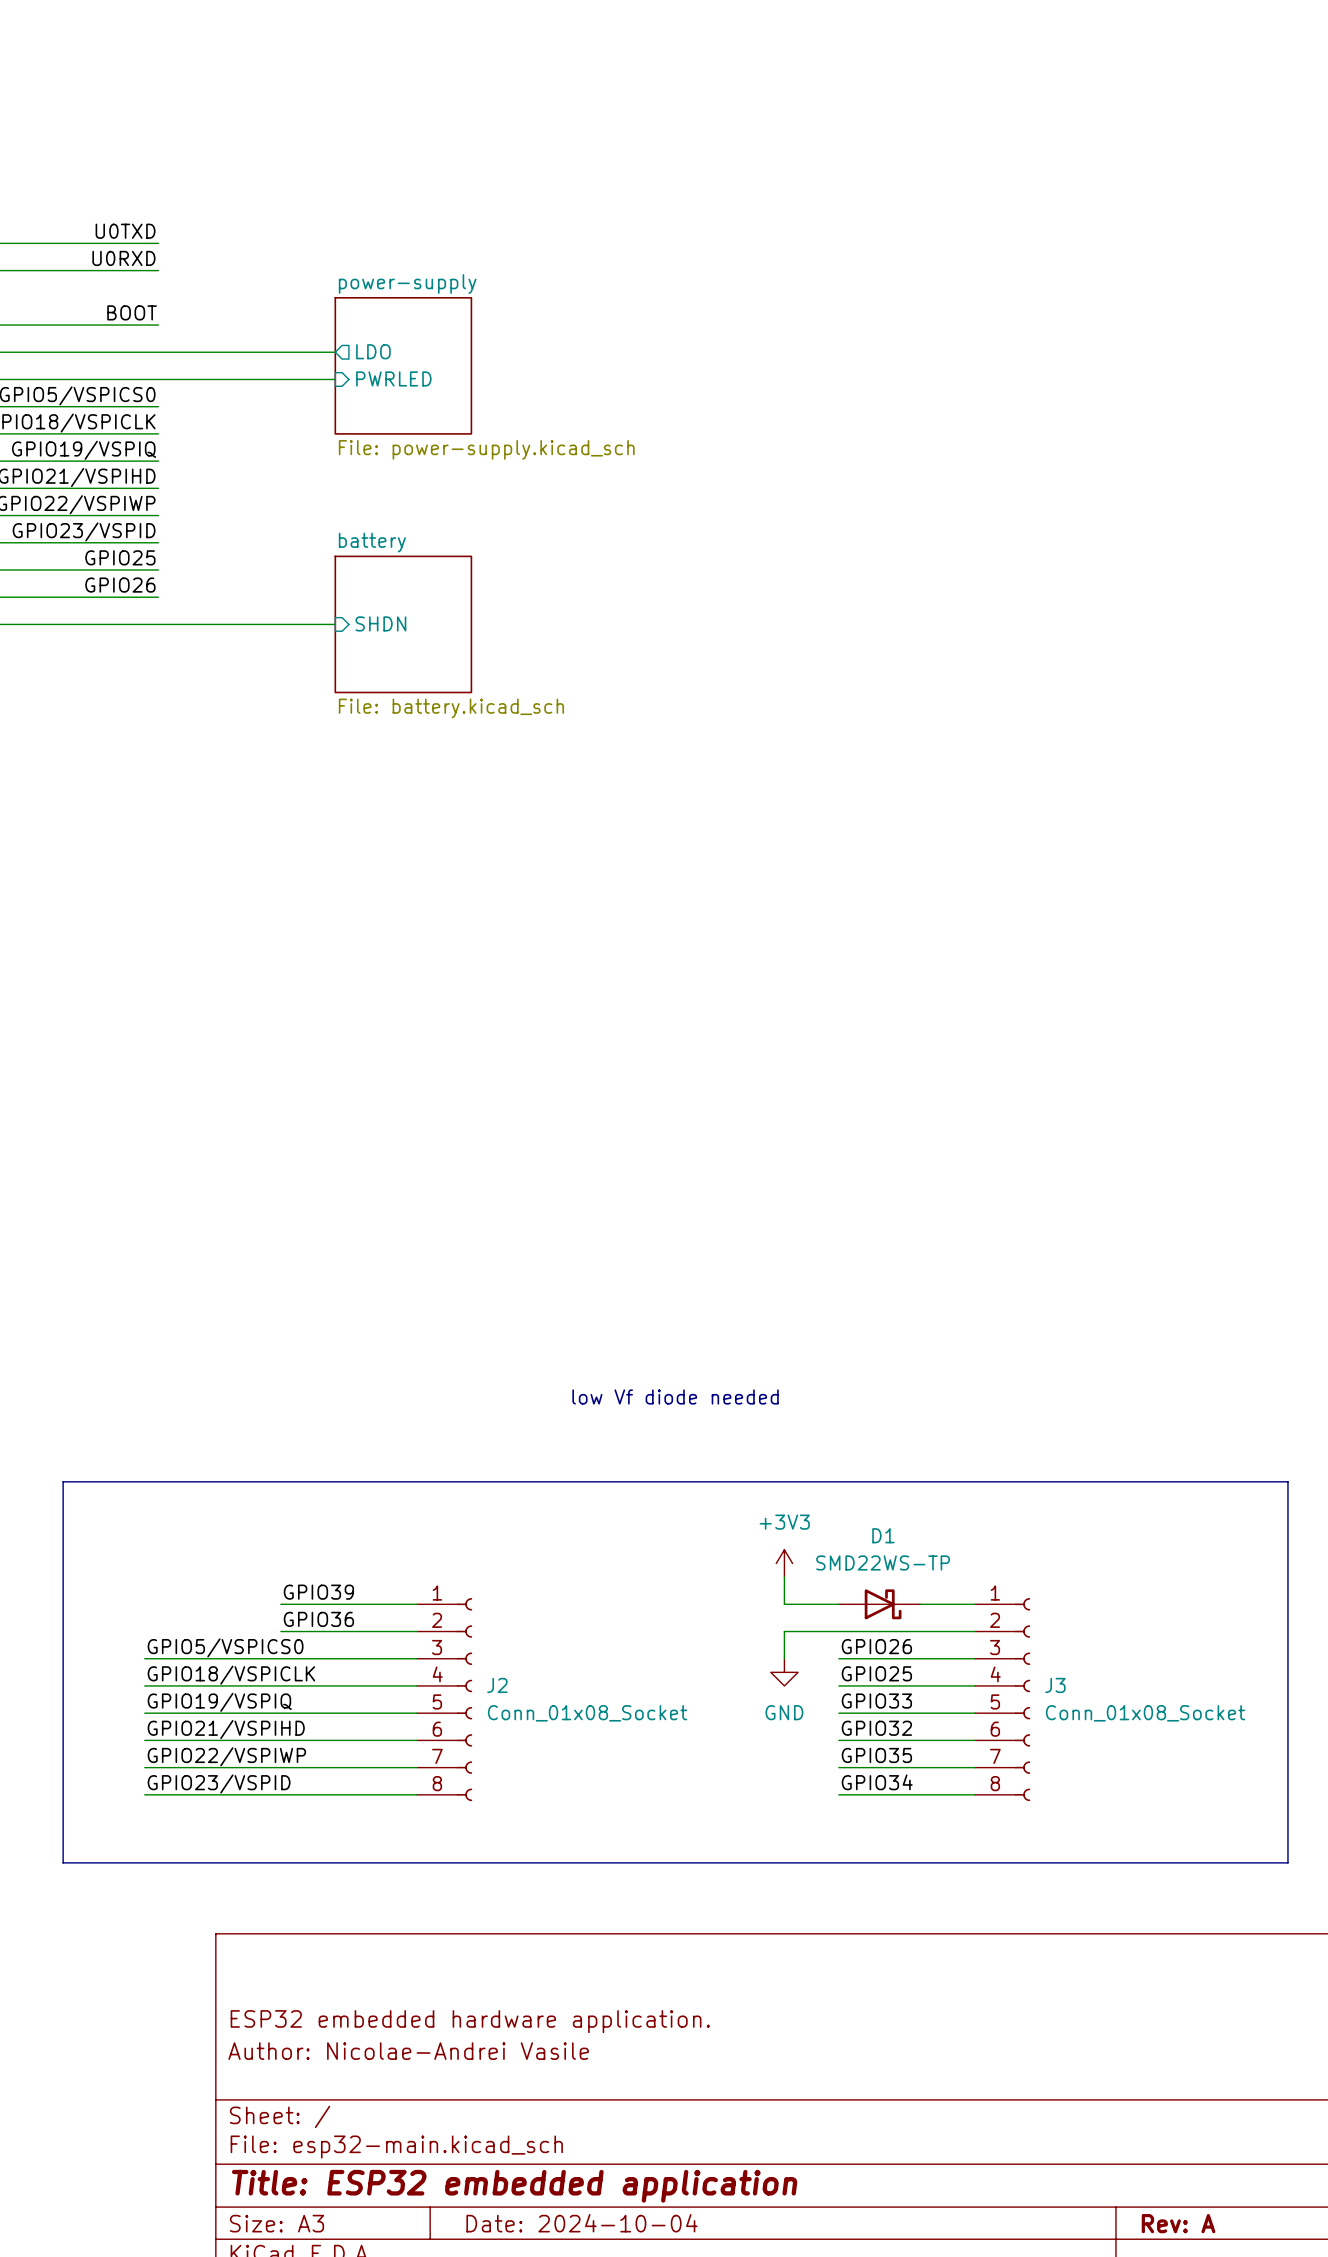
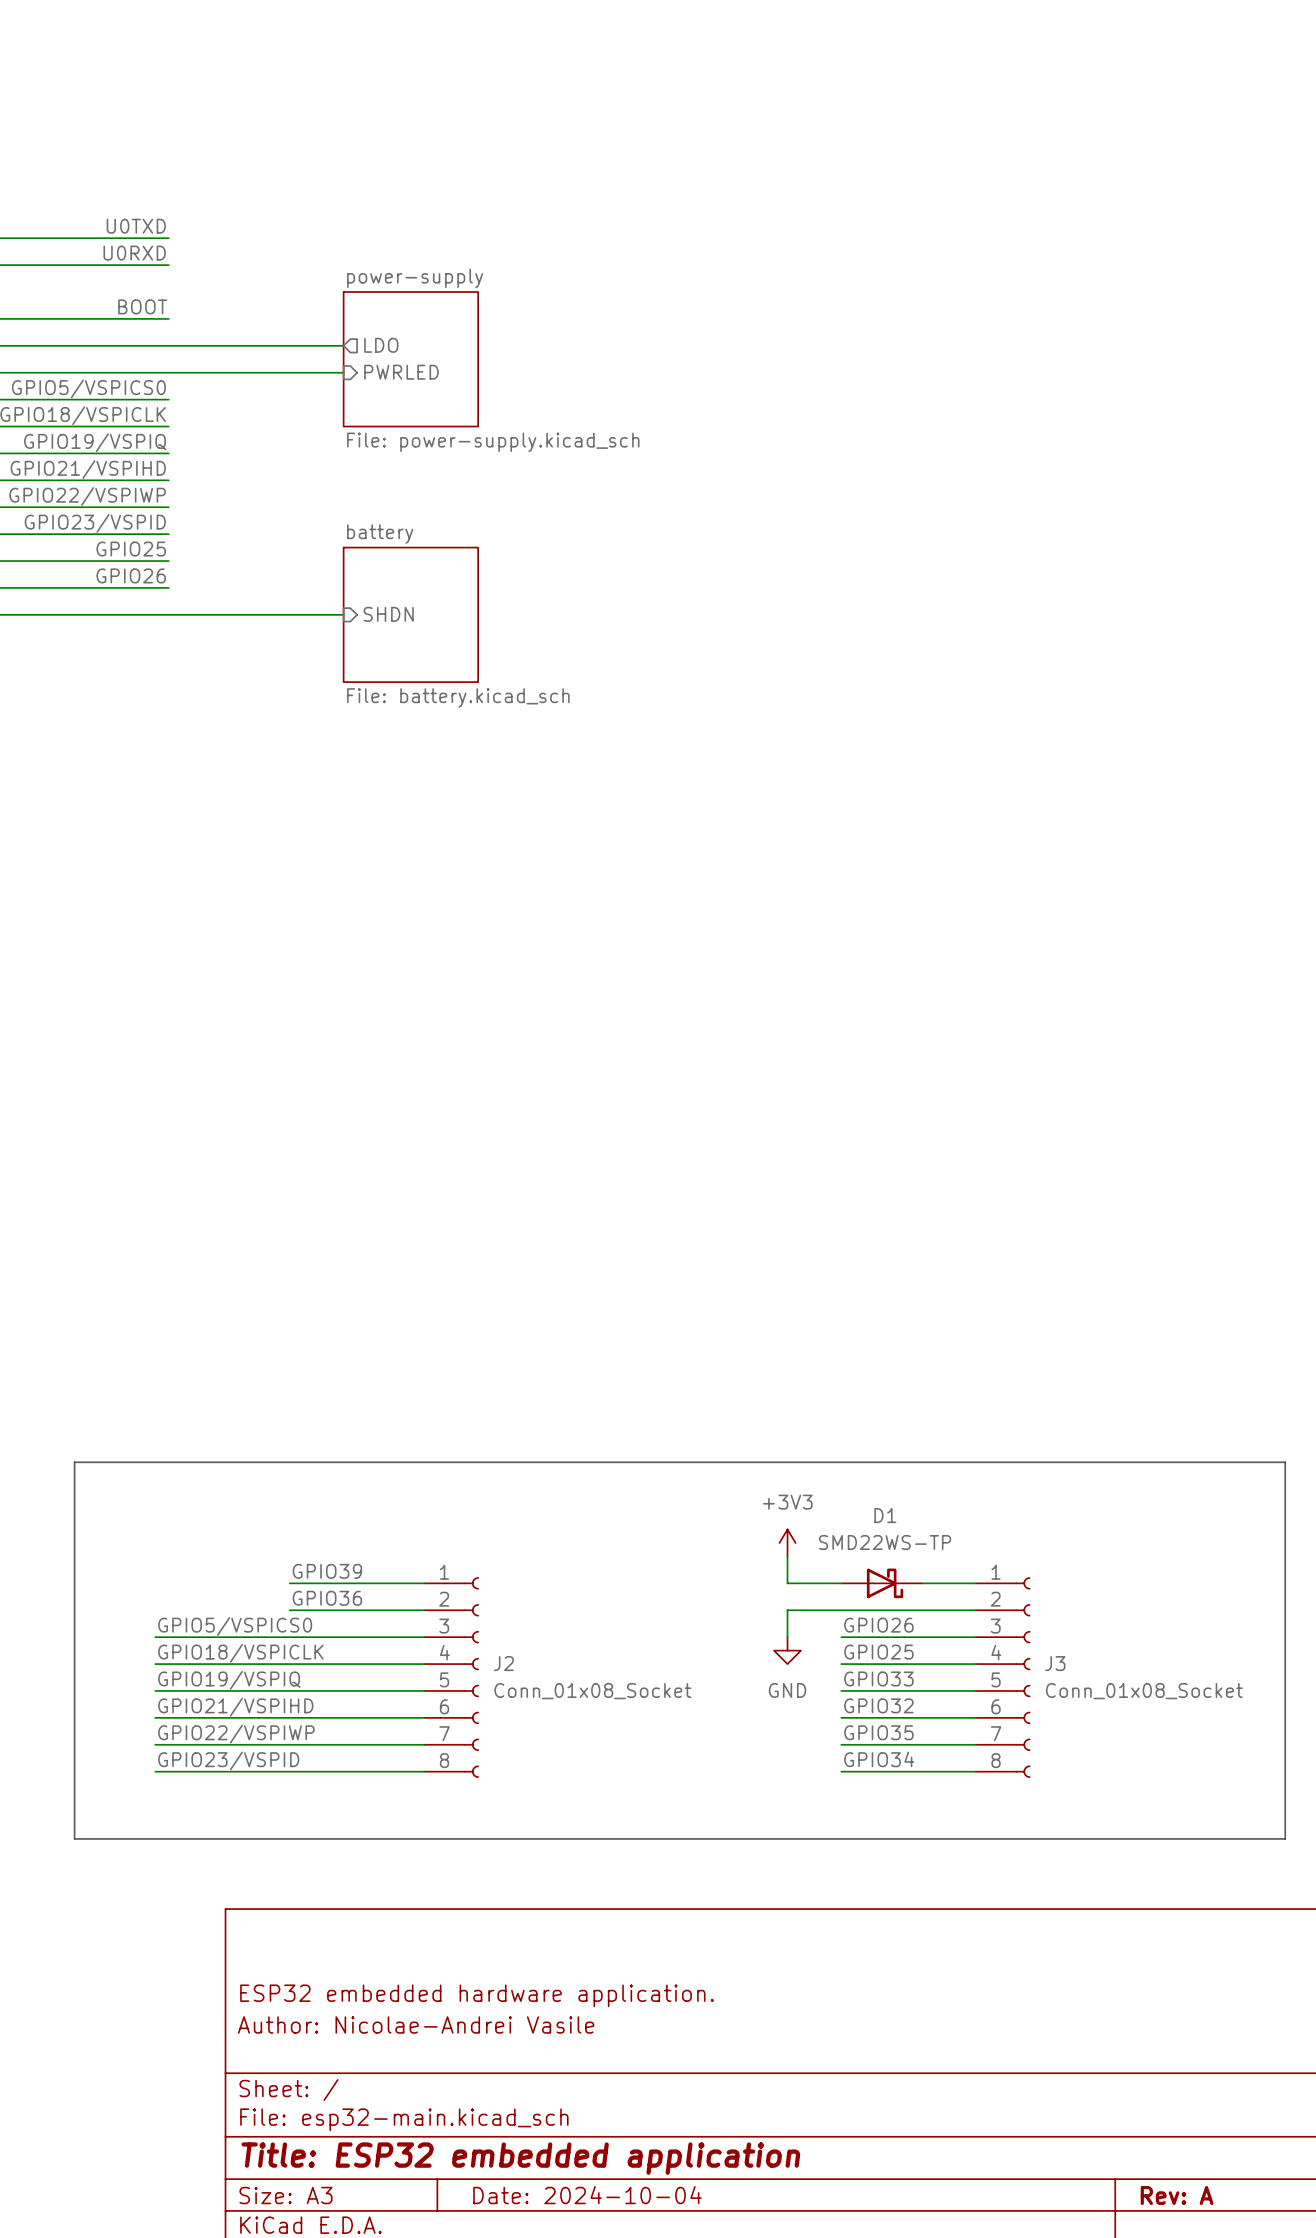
text: low Vf diode needed (675, 1396) -> none

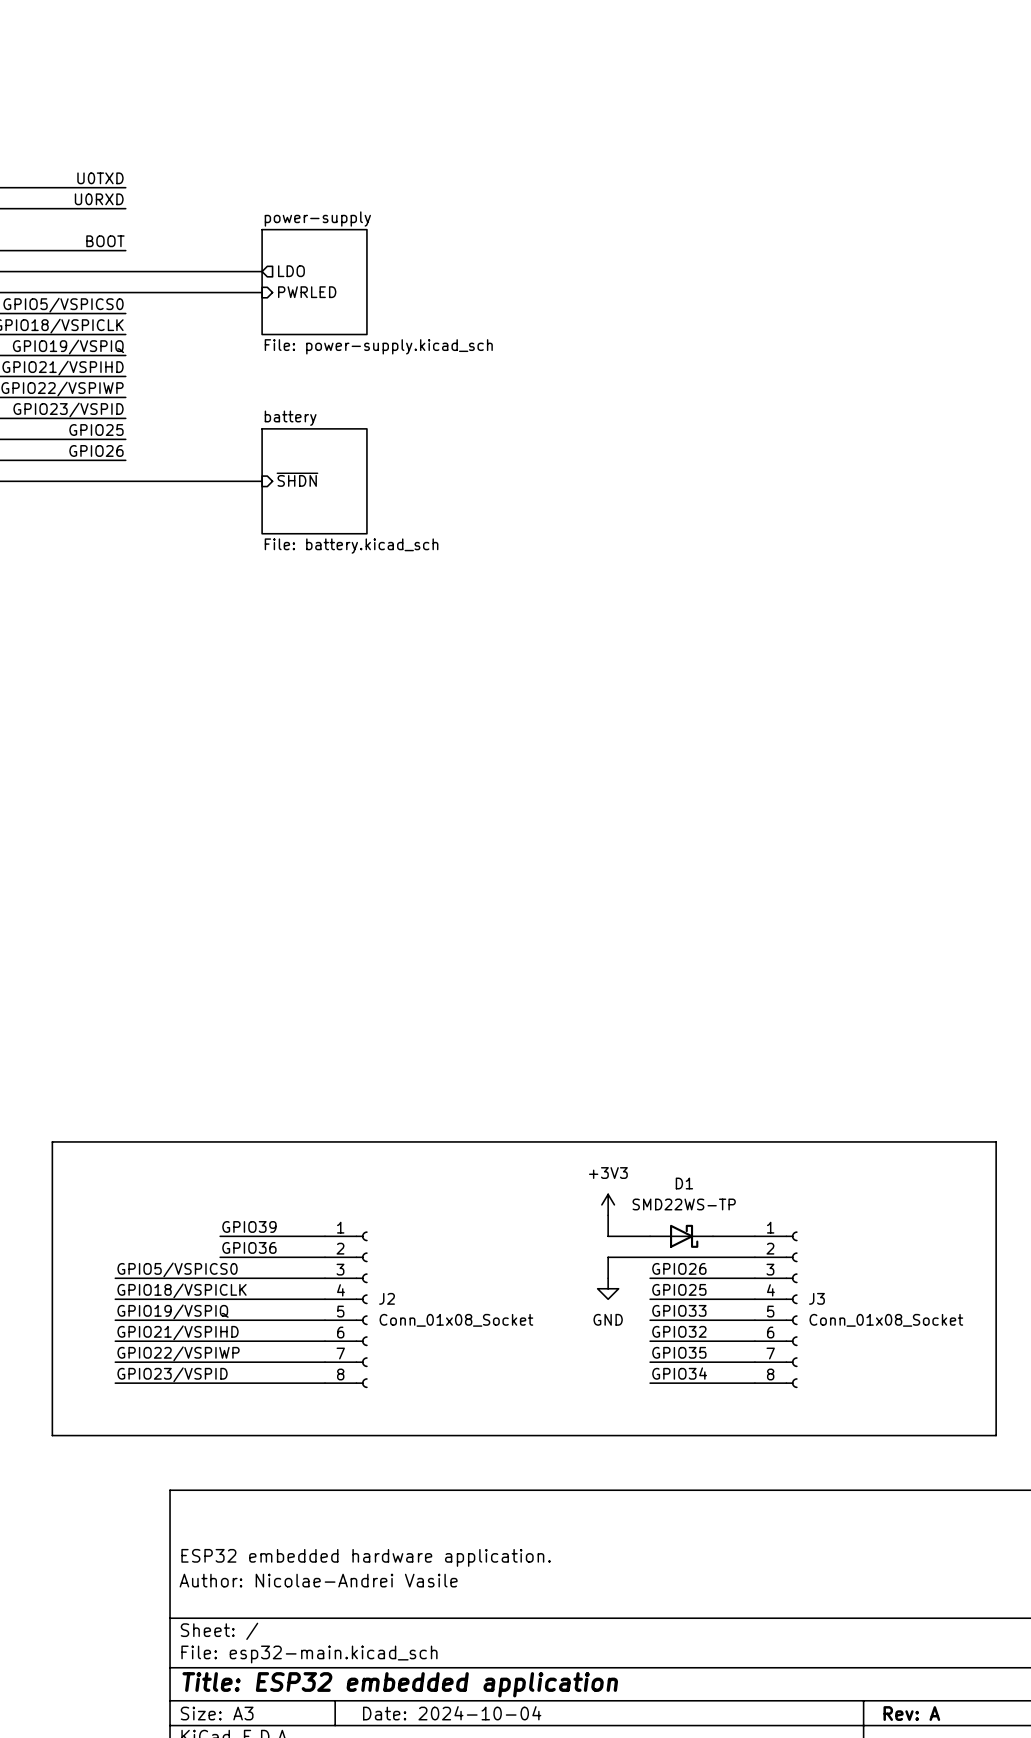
sheet pin: SHDN (388, 614) -> ~{SHDN} (297, 479)

